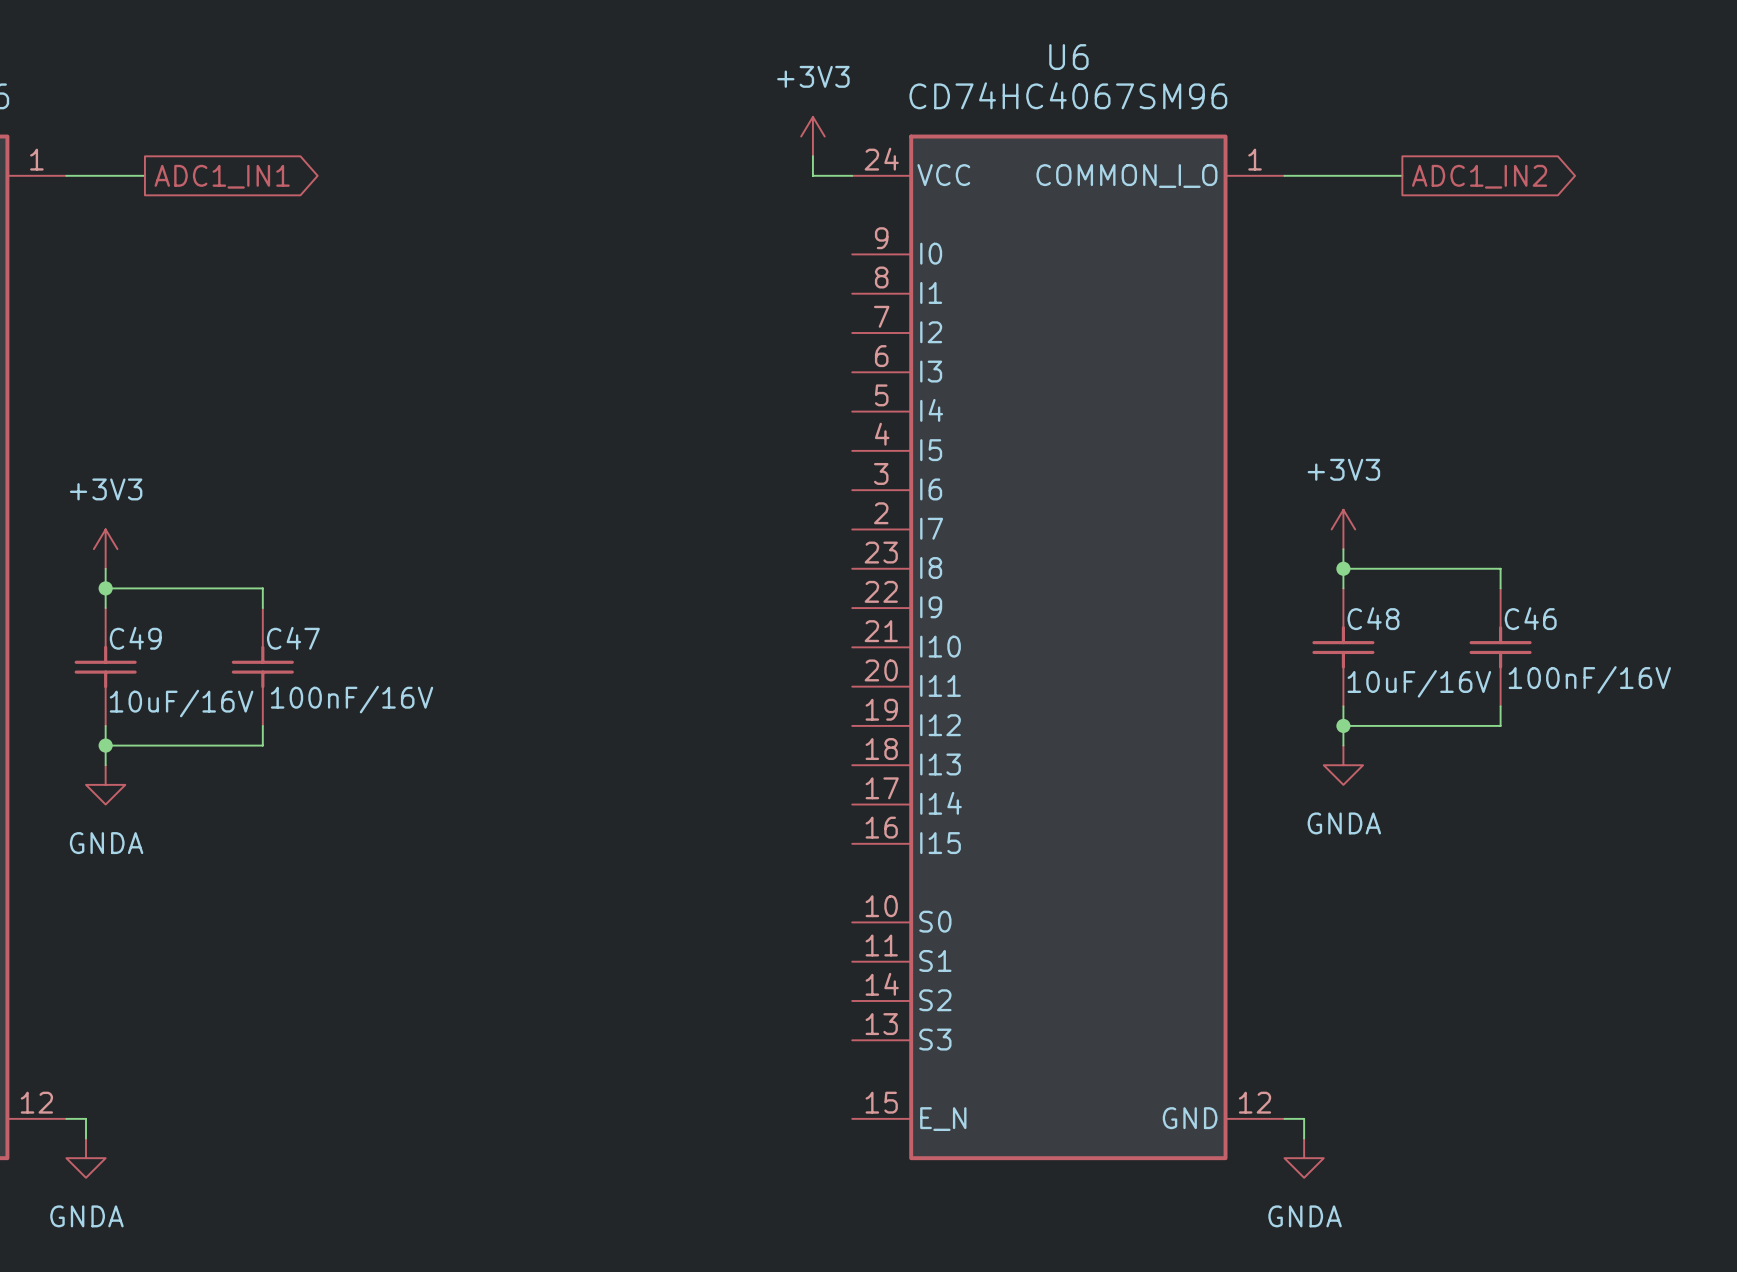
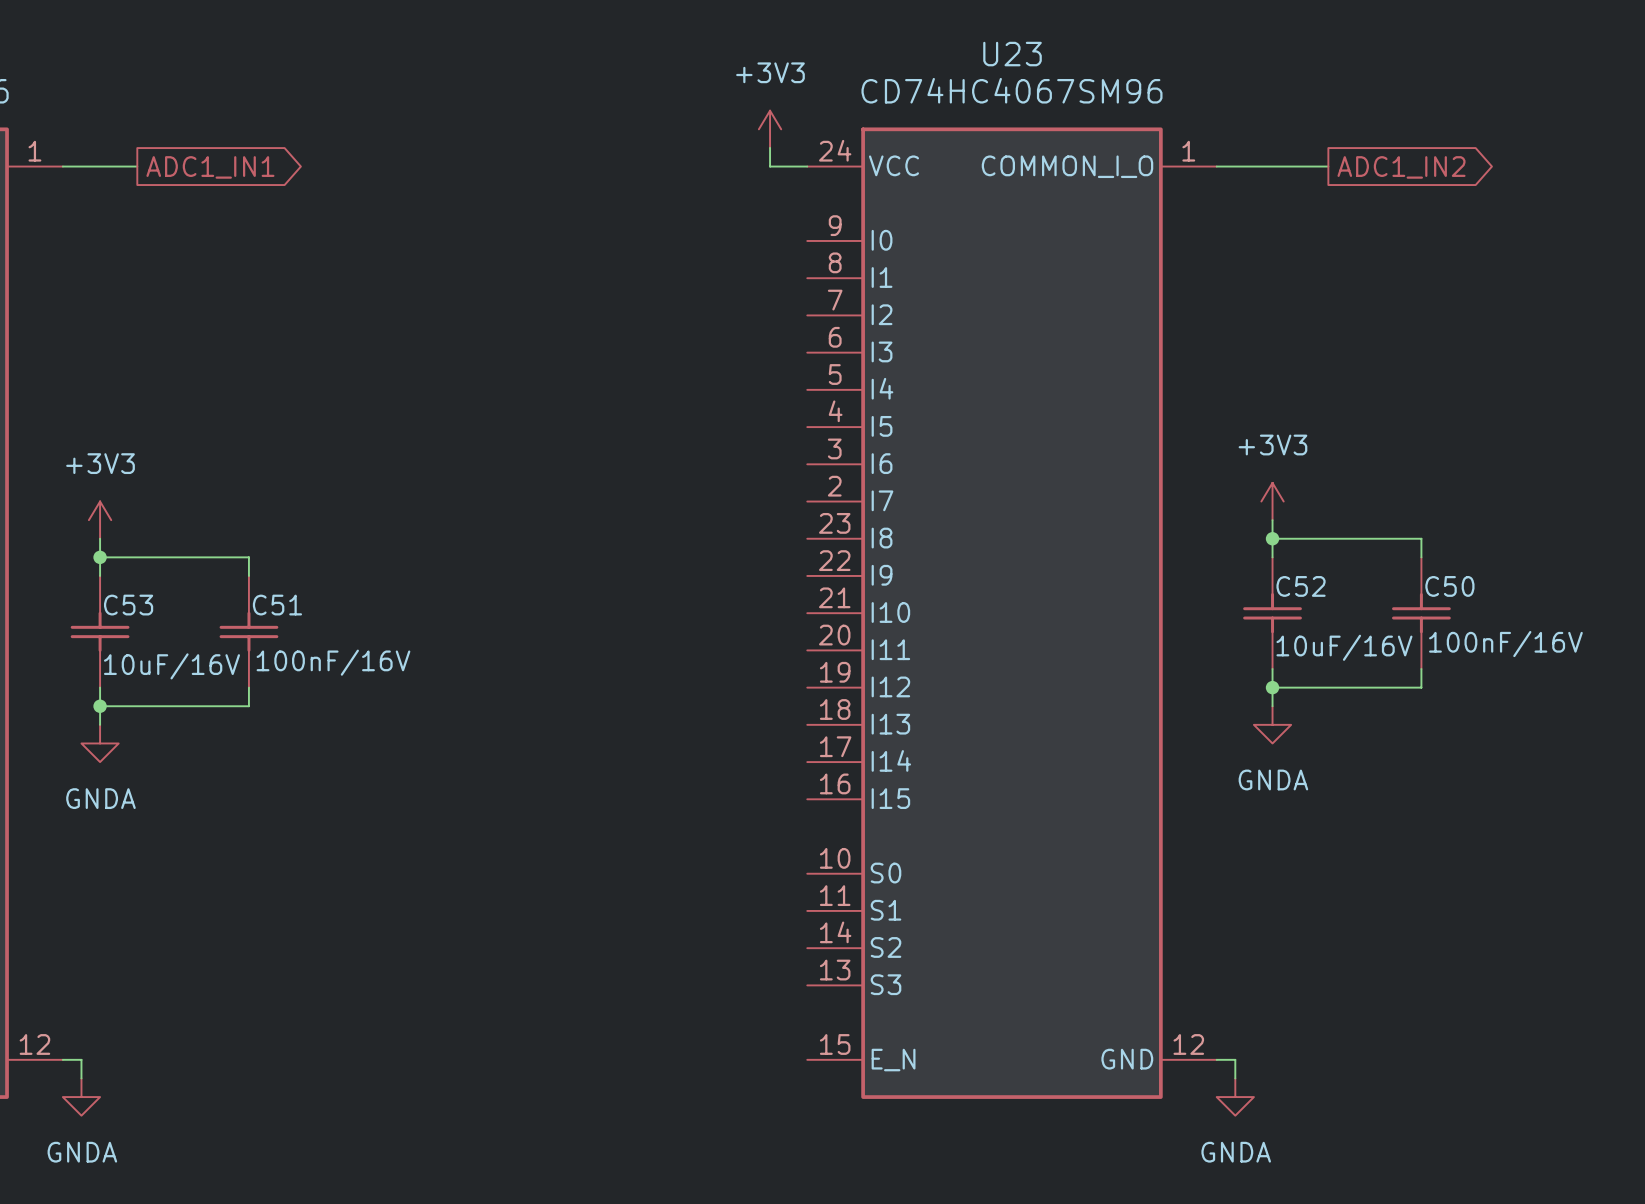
U6 name: U6 (1068, 57) -> U23 (1012, 54)
C48 name: C48 (1373, 618) -> C52 (1301, 586)
C46 name: C46 (1530, 618) -> C50 (1449, 586)
C49 name: C49 (135, 638) -> C53 (128, 605)
C47 name: C47 (293, 638) -> C51 (277, 605)

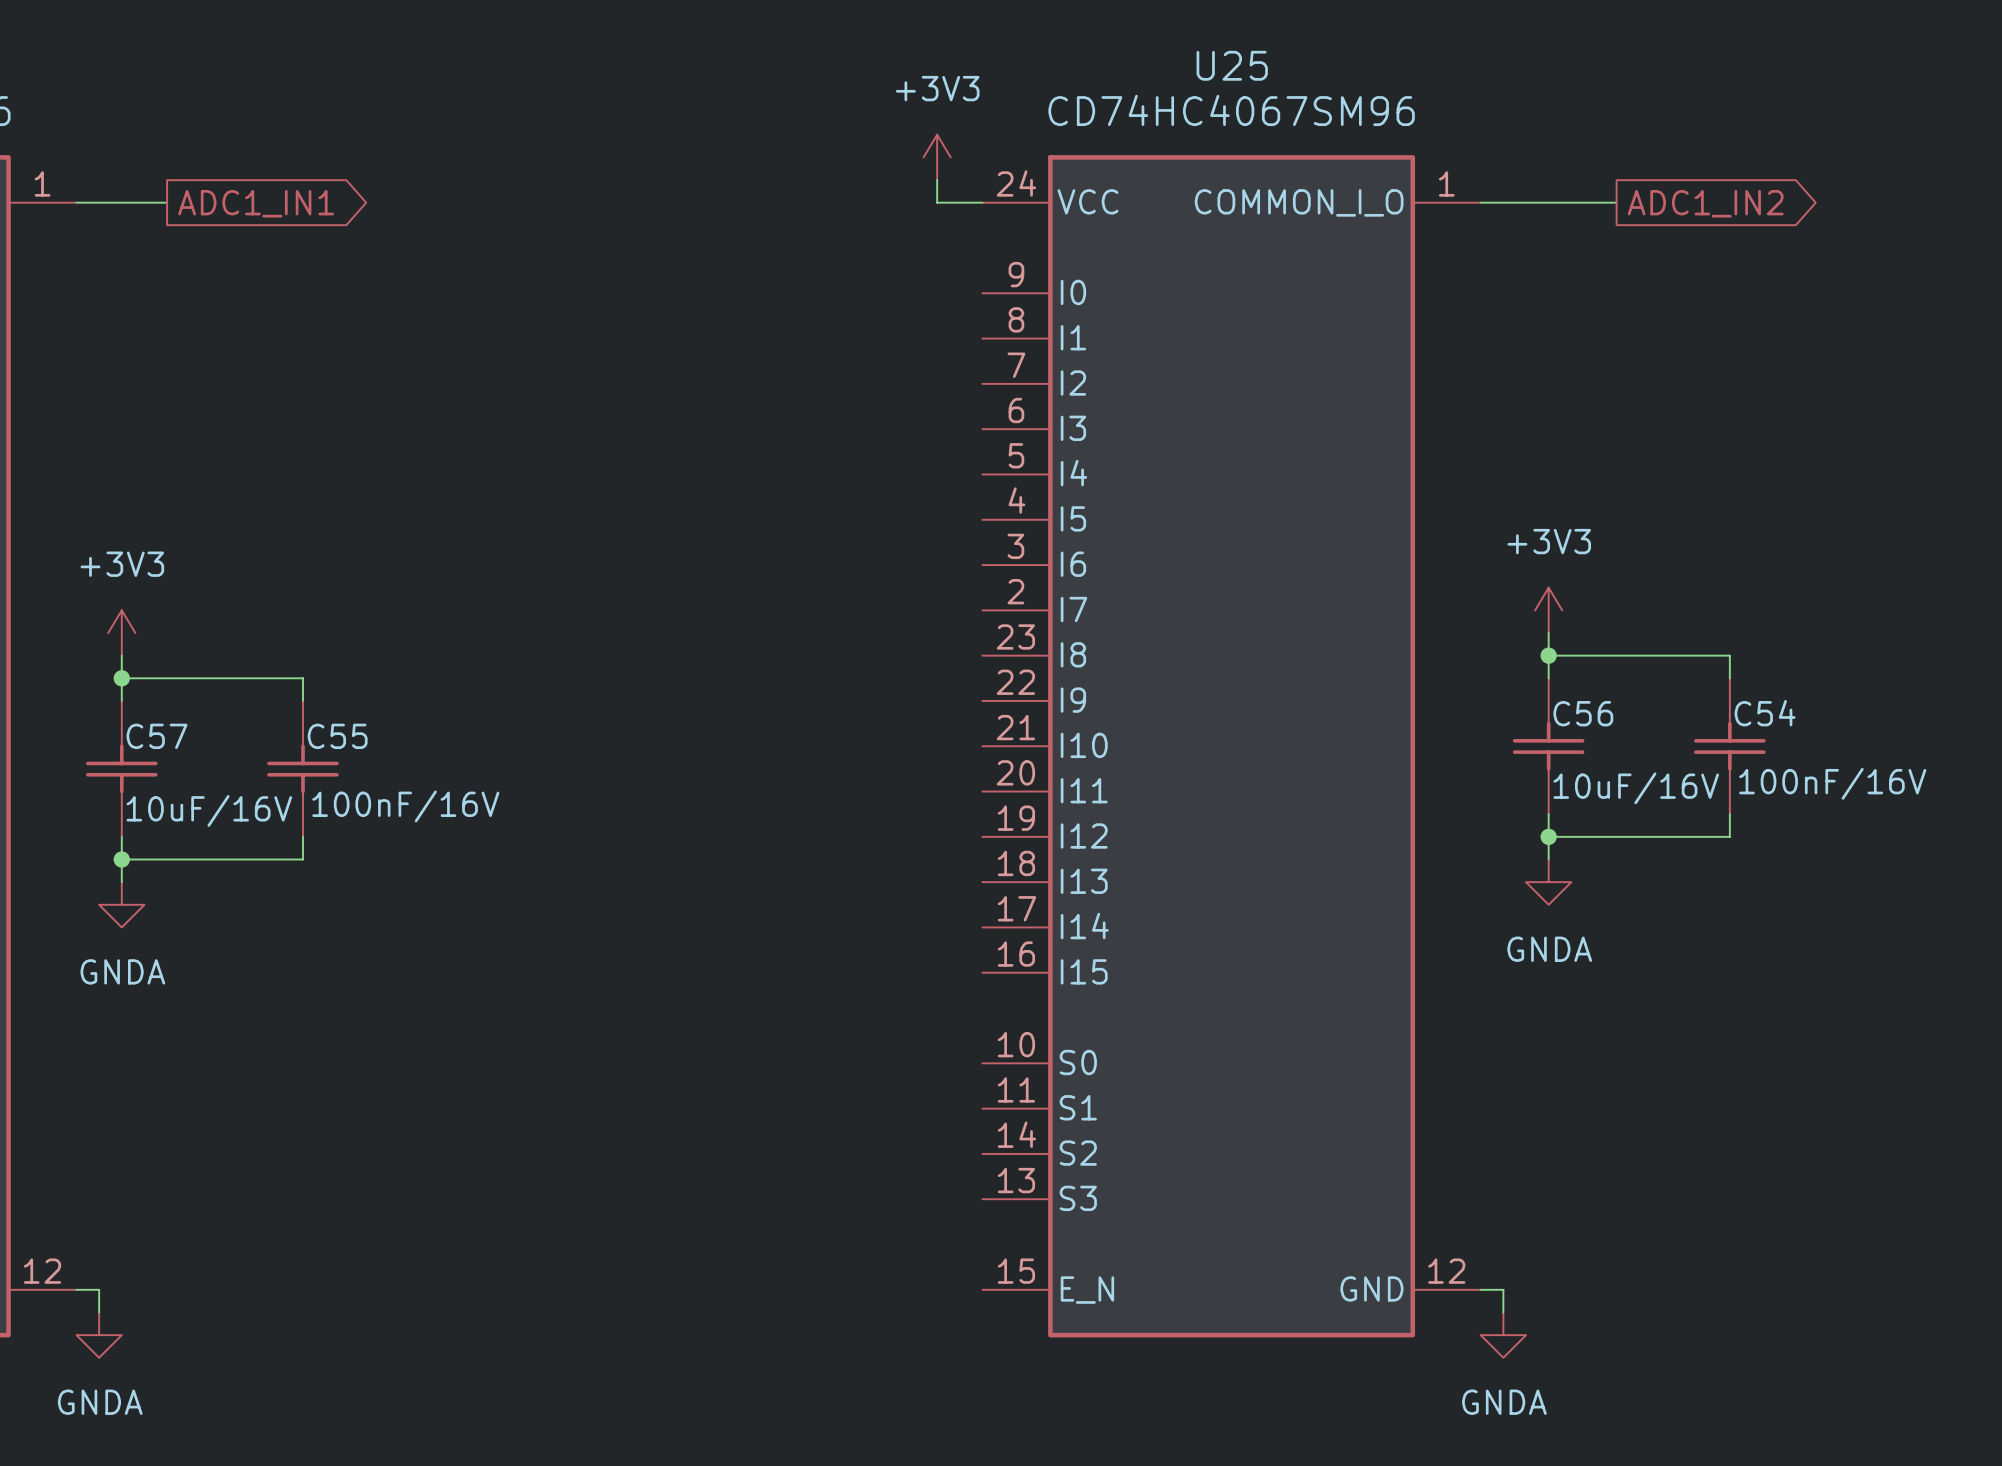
U23 name: U23 (1012, 54) -> U25 (1232, 65)
C52 name: C52 (1301, 586) -> C56 (1583, 713)
C50 name: C50 (1449, 586) -> C54 (1765, 713)
C53 name: C53 (128, 605) -> C57 (157, 736)
C51 name: C51 (277, 605) -> C55 (337, 736)

